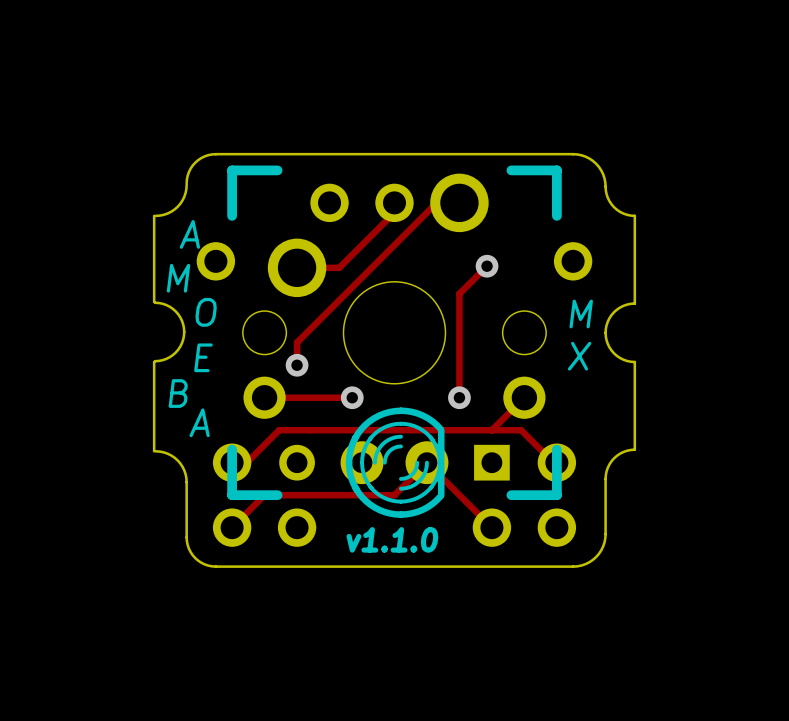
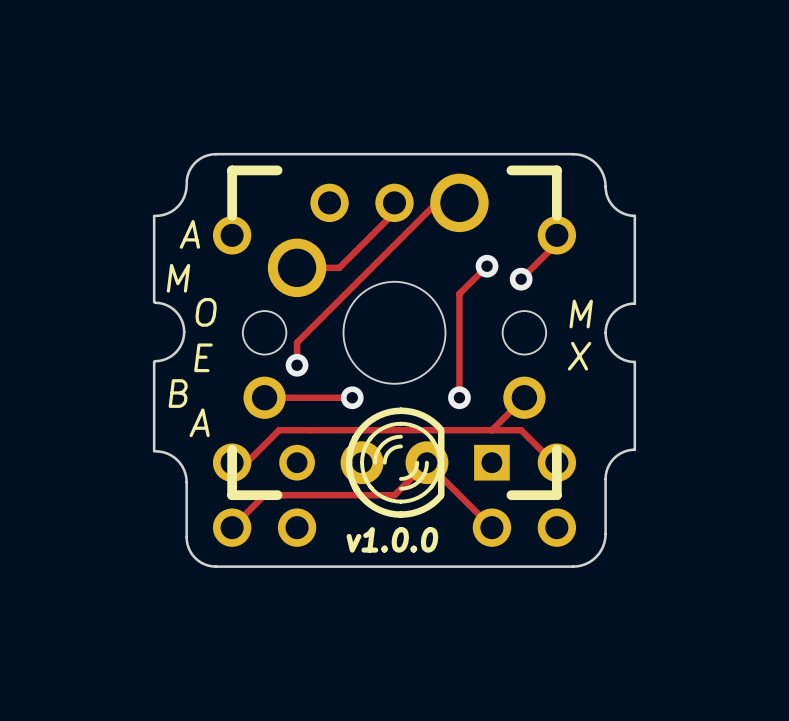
track: none -> (556, 235) (556, 243) (521, 279)
part position: (215, 261) -> (232, 235)
part position: (573, 261) -> (556, 235)
via: none -> (521, 279)
text: v1.1.0 (392, 539) -> v1.0.0 (392, 539)

